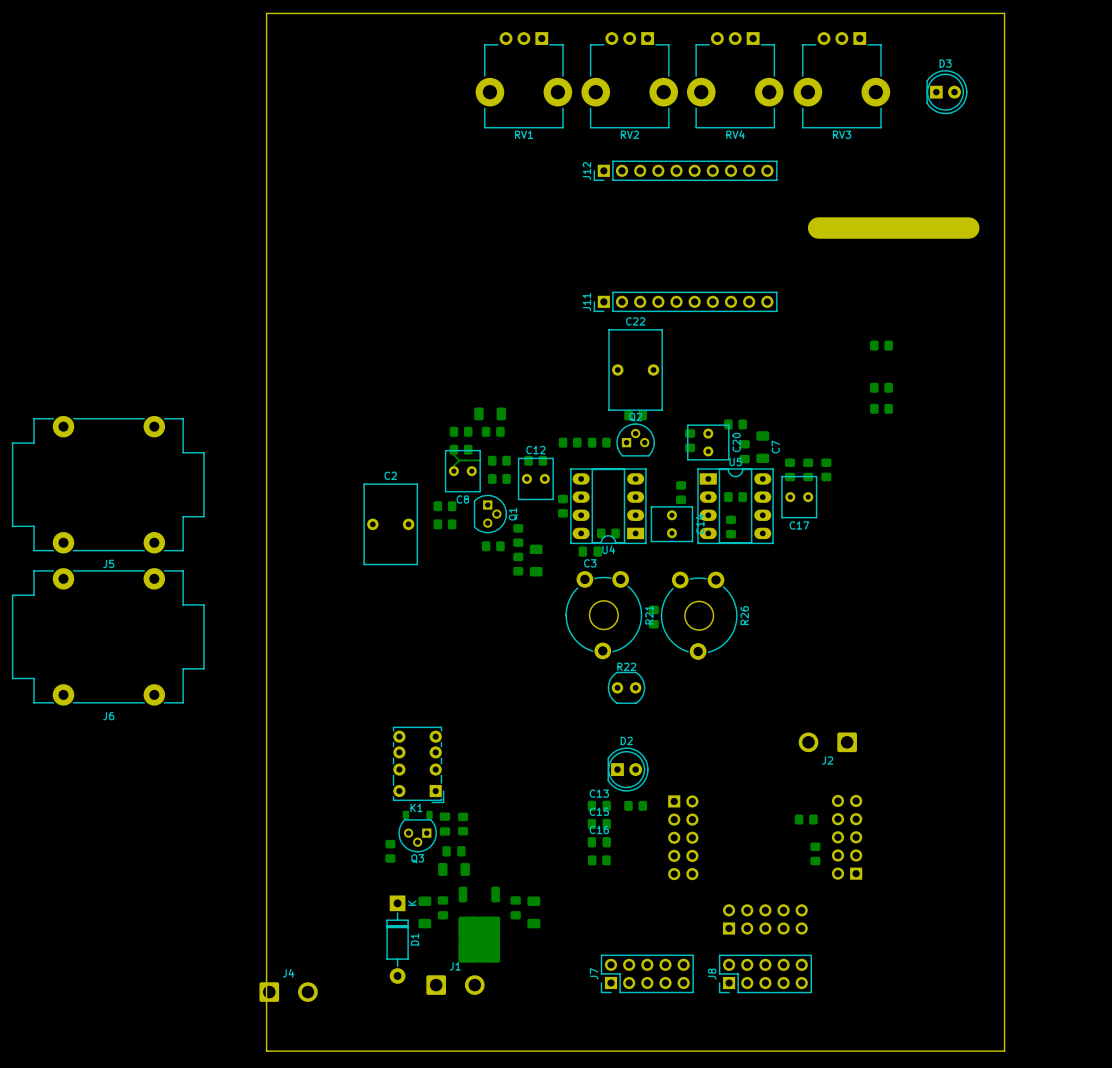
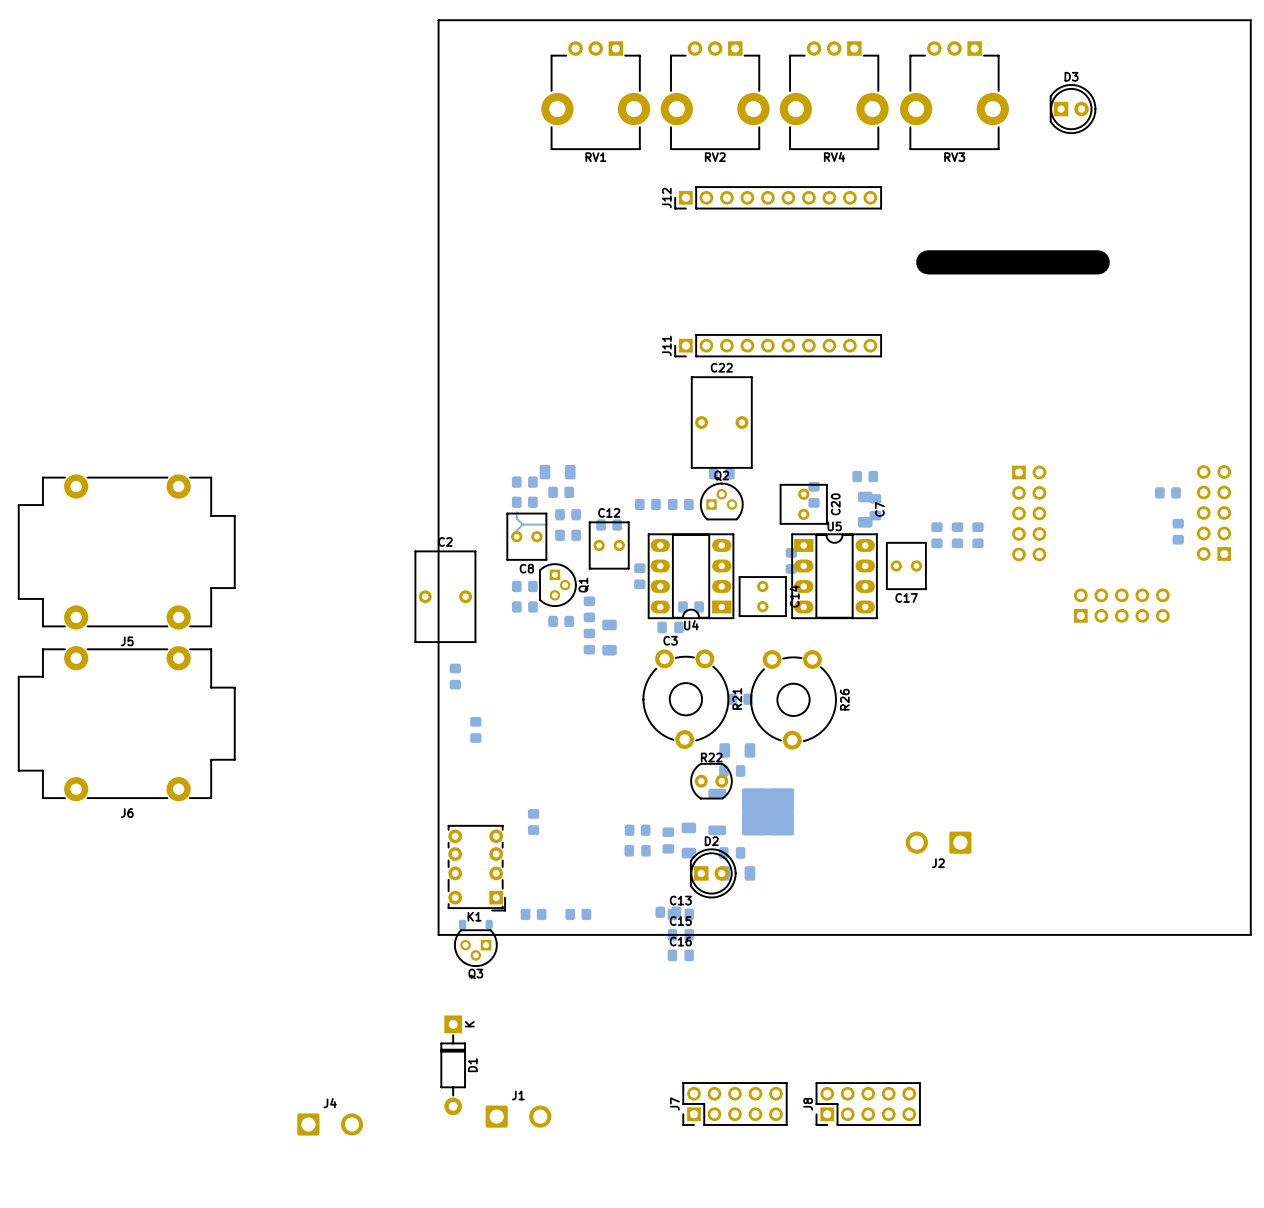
board edge: (384, 13) (266, 13) (266, 1051) (1004, 1051) (1004, 13) -> (438, 20) (438, 934) (1250, 934) (1250, 20) (1138, 20)
part: (881, 345) -> none
part: (881, 387) -> none
part: (881, 408) -> none
part: none -> (865, 476)
part: none -> (524, 482)
part: (735, 424) -> none
part: (461, 431) -> none
part: none -> (1167, 492)
part: none -> (814, 494)
part: none -> (524, 502)
part: (690, 440) -> none
part: (461, 449) -> none
part: none -> (1029, 513)
part: none -> (1213, 512)
part: none -> (568, 514)
part position: (744, 451) -> (875, 507)
part: (499, 460) -> none
part: none -> (1178, 531)
part: none -> (568, 535)
part: (790, 469) -> none
part: (808, 469) -> none
part: none -> (957, 535)
part: none -> (977, 535)
part: (499, 478) -> none
part position: (681, 492) -> (791, 560)
part: (735, 497) -> none
part: (444, 506) -> none
part: none -> (524, 586)
part: (444, 524) -> none
part: (730, 526) -> none
part: none -> (1121, 605)
part: none -> (524, 606)
part: none -> (455, 676)
part rotation: 0° (653, 617) -> 90° clockwise (740, 699)
part: none -> (475, 729)
part: none -> (737, 750)
part: none -> (732, 770)
part: none -> (751, 811)
part: none -> (533, 822)
part: none -> (637, 830)
part: none -> (668, 840)
part: none -> (688, 840)
part: none -> (637, 850)
part: none -> (732, 852)
part: none -> (737, 873)
part: none -> (668, 912)
part: none -> (578, 914)
part: (635, 805) -> none
part: (806, 819) -> none
part: (444, 824) -> none
part rotation: 0° (463, 824) -> 90° clockwise (533, 914)
part position: (463, 824) -> (533, 914)
part: (683, 837) -> none
part: (847, 837) -> none
part: (390, 851) -> none
part: (454, 851) -> none
part: (815, 853) -> none
part: (599, 860) -> none
part: (454, 869) -> none
part: (442, 907) -> none
part: (515, 907) -> none
part: (424, 912) -> none
part: (533, 912) -> none
part: (765, 919) -> none
part: (479, 924) -> none

